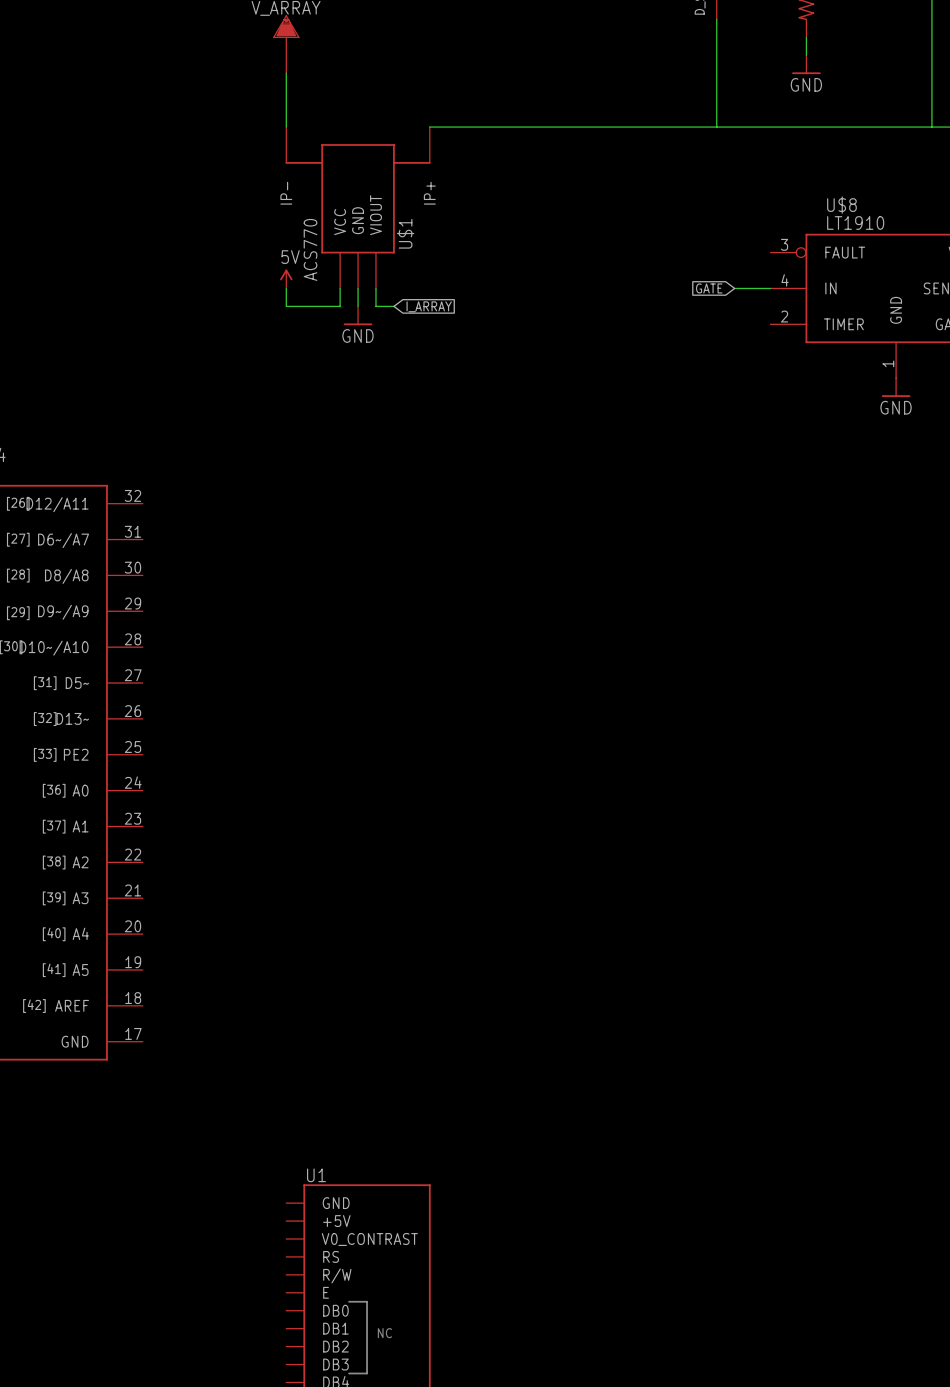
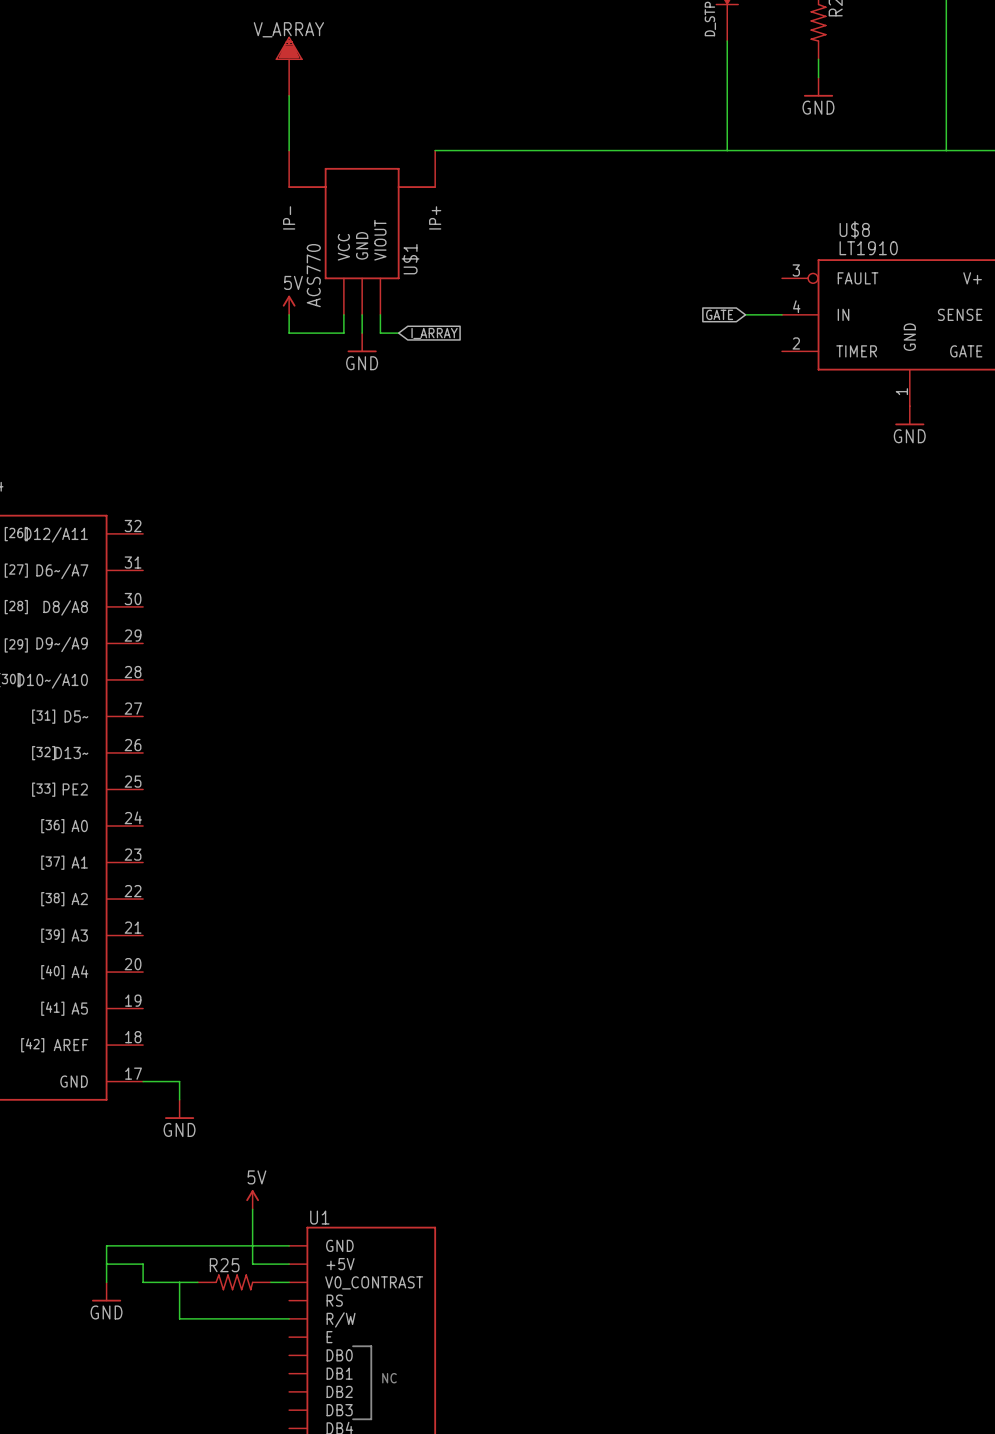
wire: none -> (143, 1081) (179, 1081) (179, 1099)
power symbol: none -> GND (179, 1109)
power symbol: none -> 5V (252, 1199)
wire: none -> (252, 1209) (252, 1264) (289, 1264)
wire: none -> (289, 1245) (106, 1245) (106, 1282)
wire: none -> (106, 1264) (143, 1264) (143, 1282) (197, 1282)
wire: none -> (179, 1282) (179, 1318) (289, 1318)
R25: none -> (234, 1282)
wire: none -> (270, 1282) (289, 1282)
power symbol: none -> GND (106, 1291)

